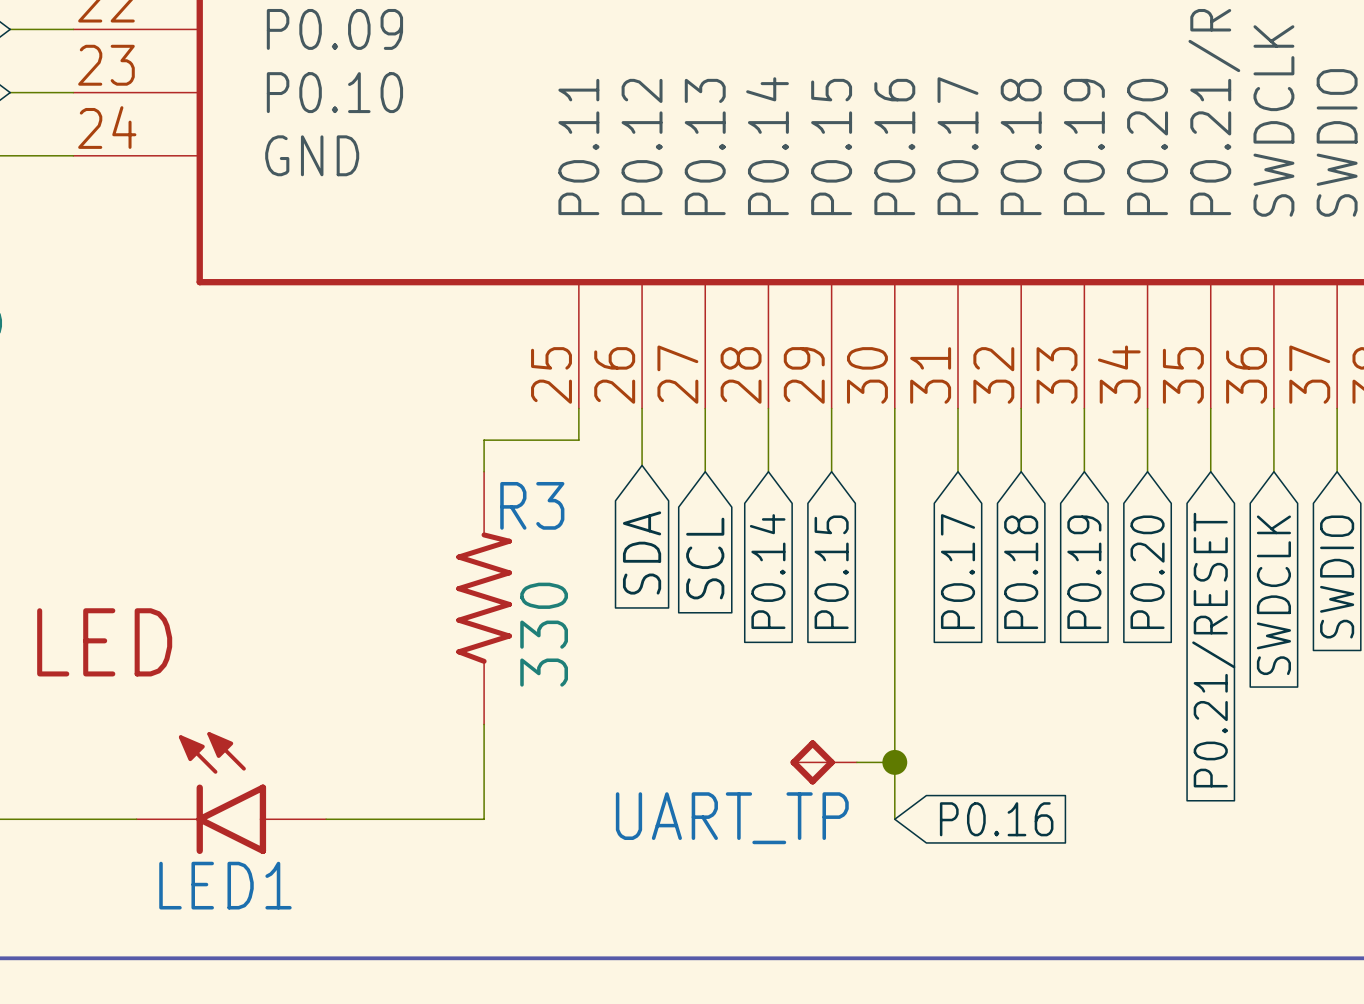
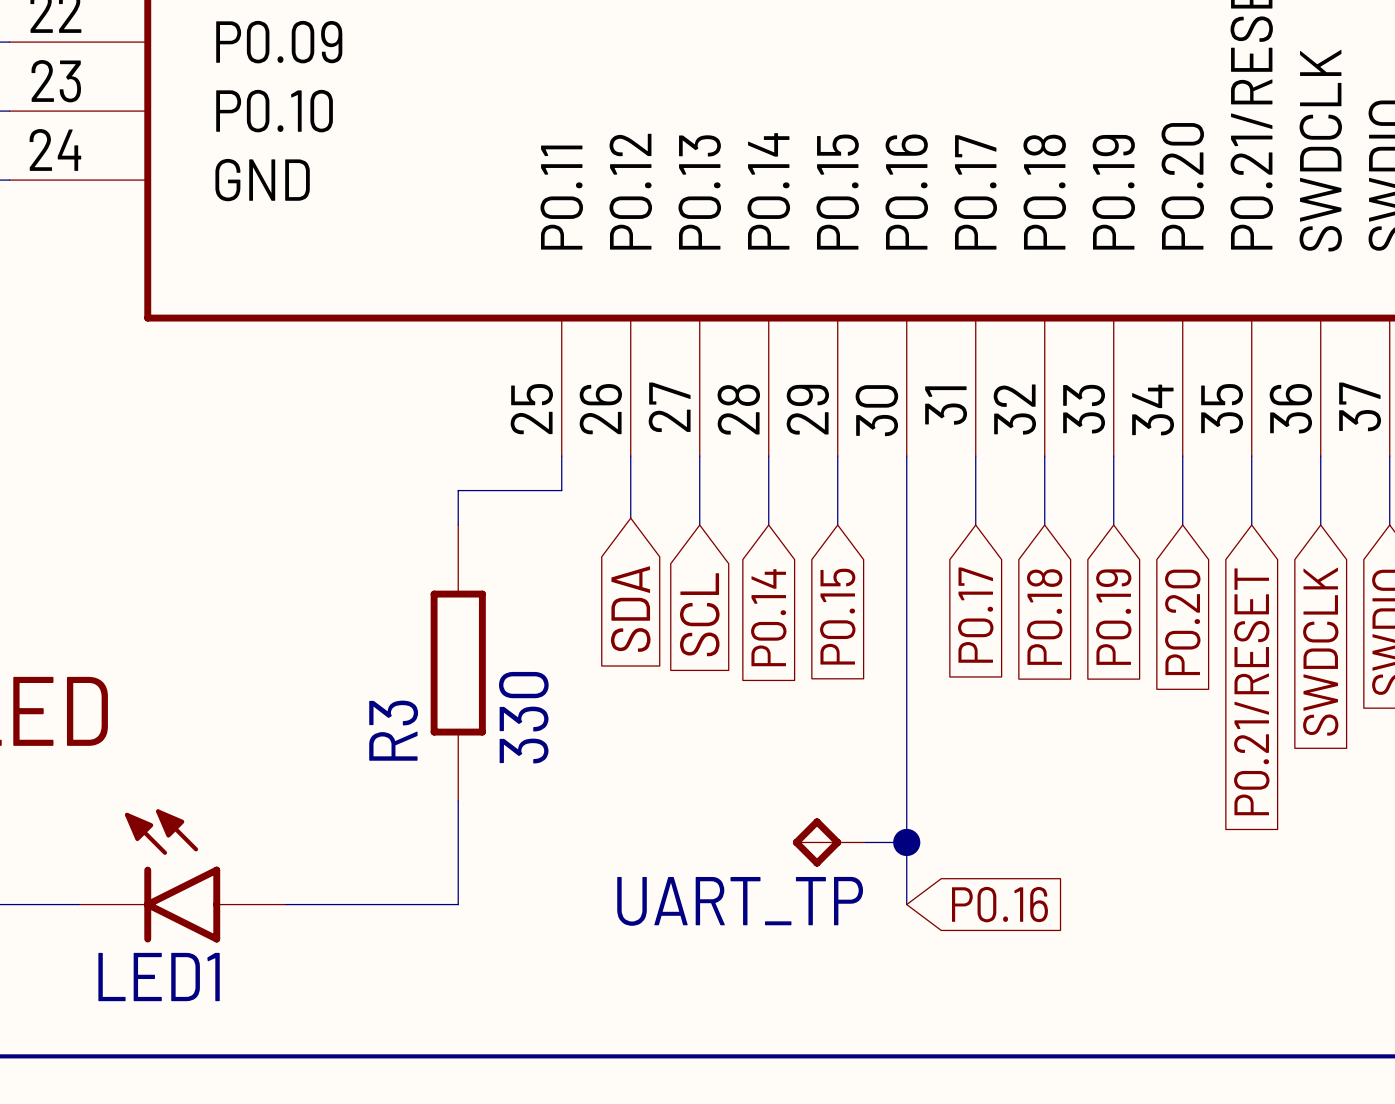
R3 symbol: [456, 471, 512, 725] -> [430, 525, 486, 802]
R3 name rotation: 0° (532, 505) -> 90° counterclockwise (393, 730)
R3 name position: R3 (532, 505) -> R3 (393, 730)

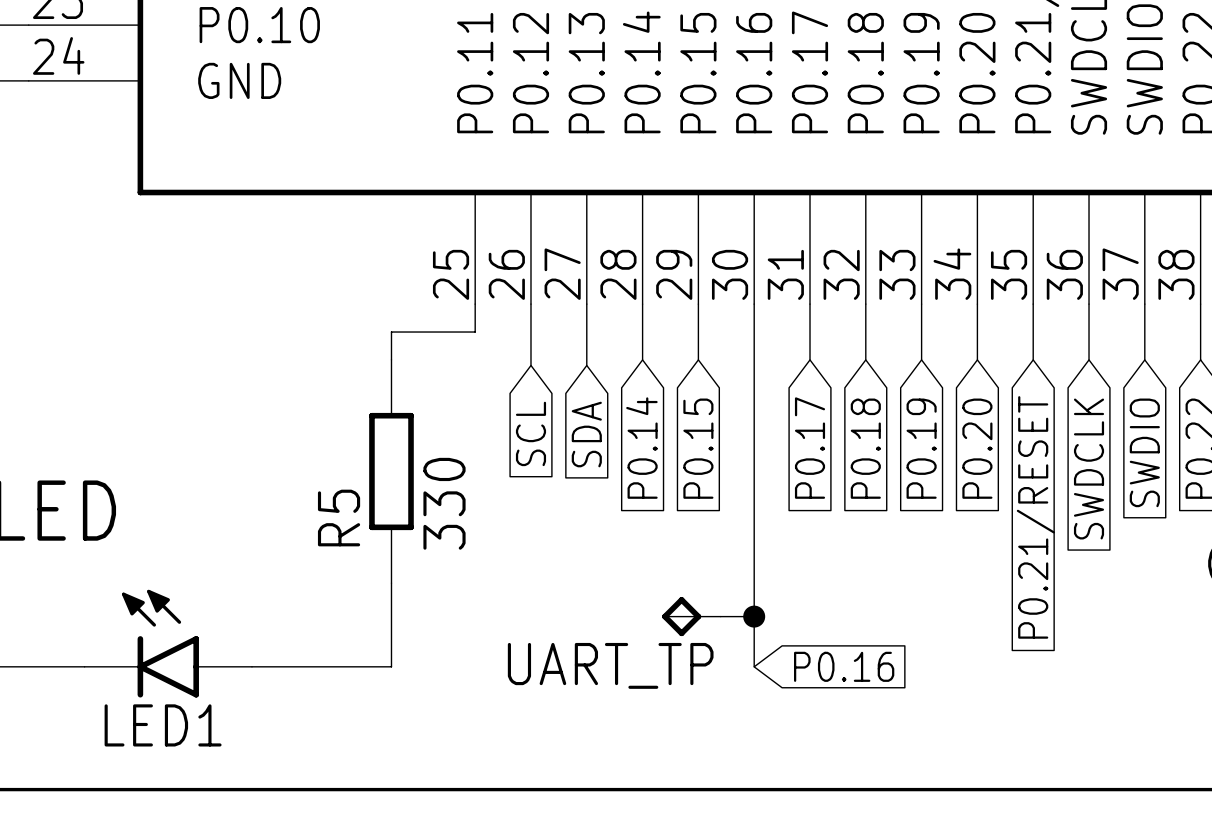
wire: none -> (530, 354) (530, 365)
wire: none -> (586, 359) (586, 365)
global label: SDA (630, 609) -> SCL (530, 433)
global label: SCL (699, 614) -> SDA (586, 434)
R3 name: R3 (393, 730) -> R5 (339, 518)

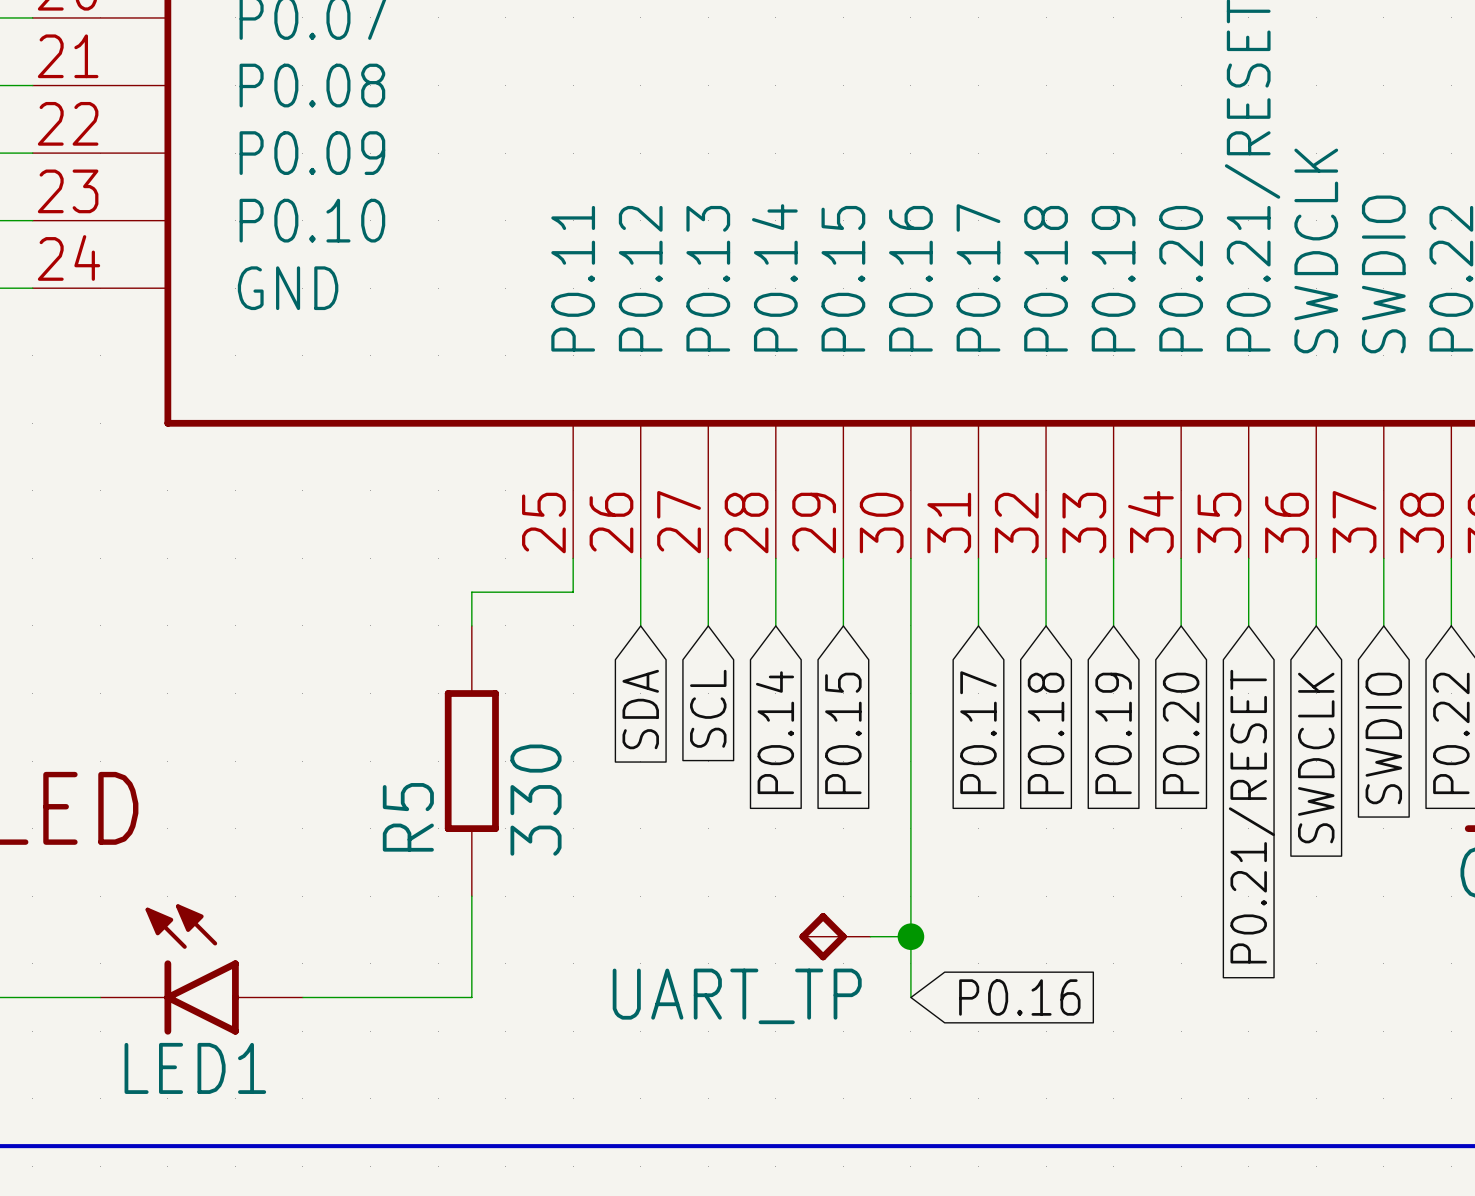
wire: (530, 359) (530, 365) -> none
wire: (586, 359) (586, 365) -> none
global label: SCL (530, 433) -> SDA (640, 709)
global label: SDA (586, 434) -> SCL (708, 708)

